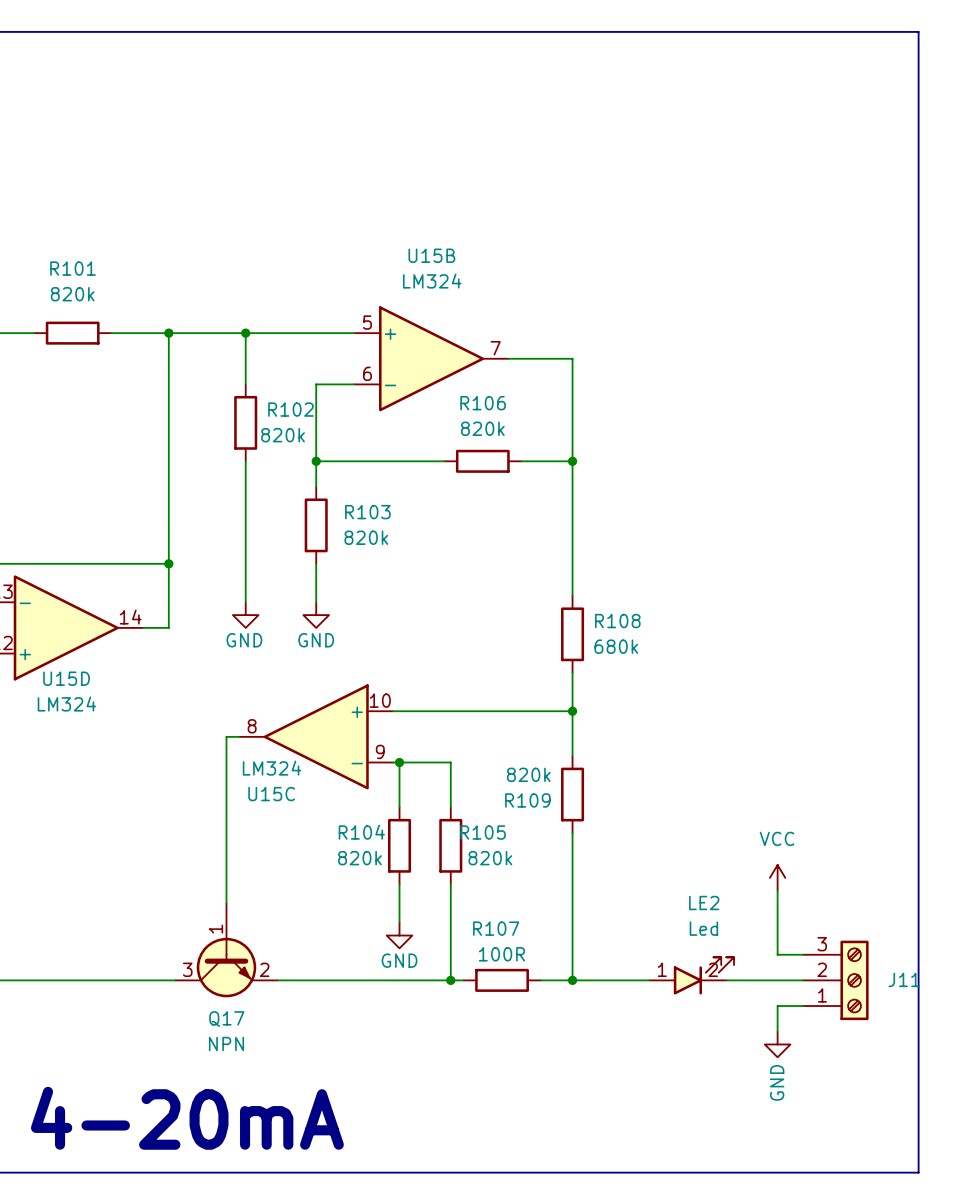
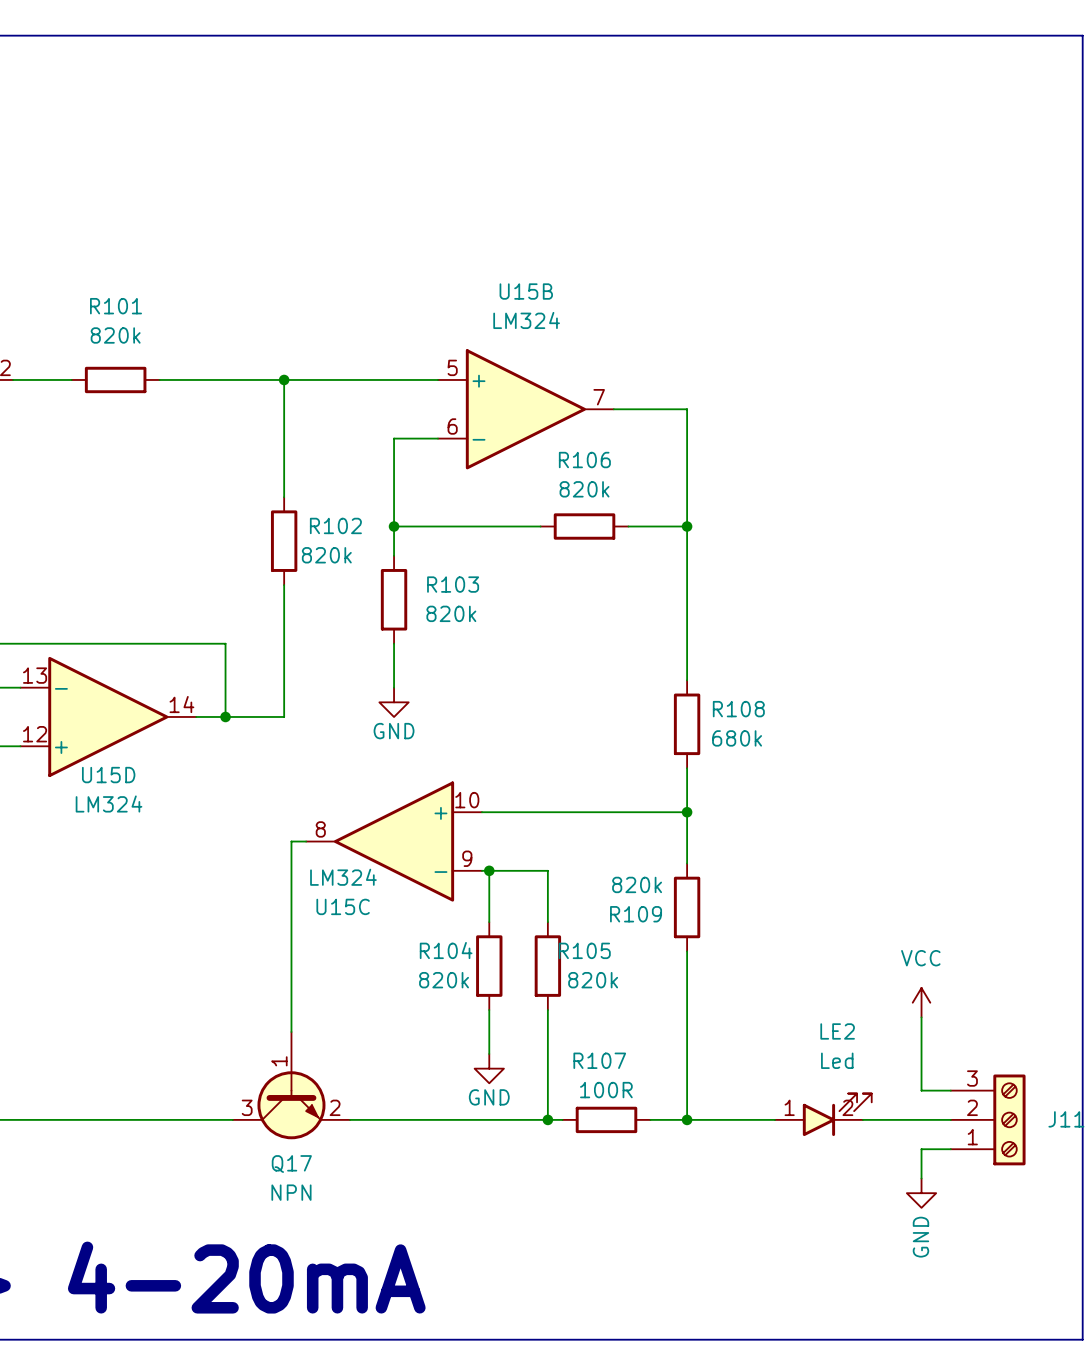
wire: (168, 333) (168, 563) -> none
junction: (168, 333) -> none
wire: none -> (284, 379) (284, 497)
junction: none -> (284, 379)
wire: (245, 333) (245, 384) -> none
junction: (245, 333) -> none
R102 position: (245, 422) -> (284, 541)
wire: (245, 461) (245, 602) -> none
wire: none -> (284, 585) (284, 716) (225, 716)
junction: (168, 563) -> none
power symbol: GND (245, 615) -> none
junction: none -> (225, 716)

